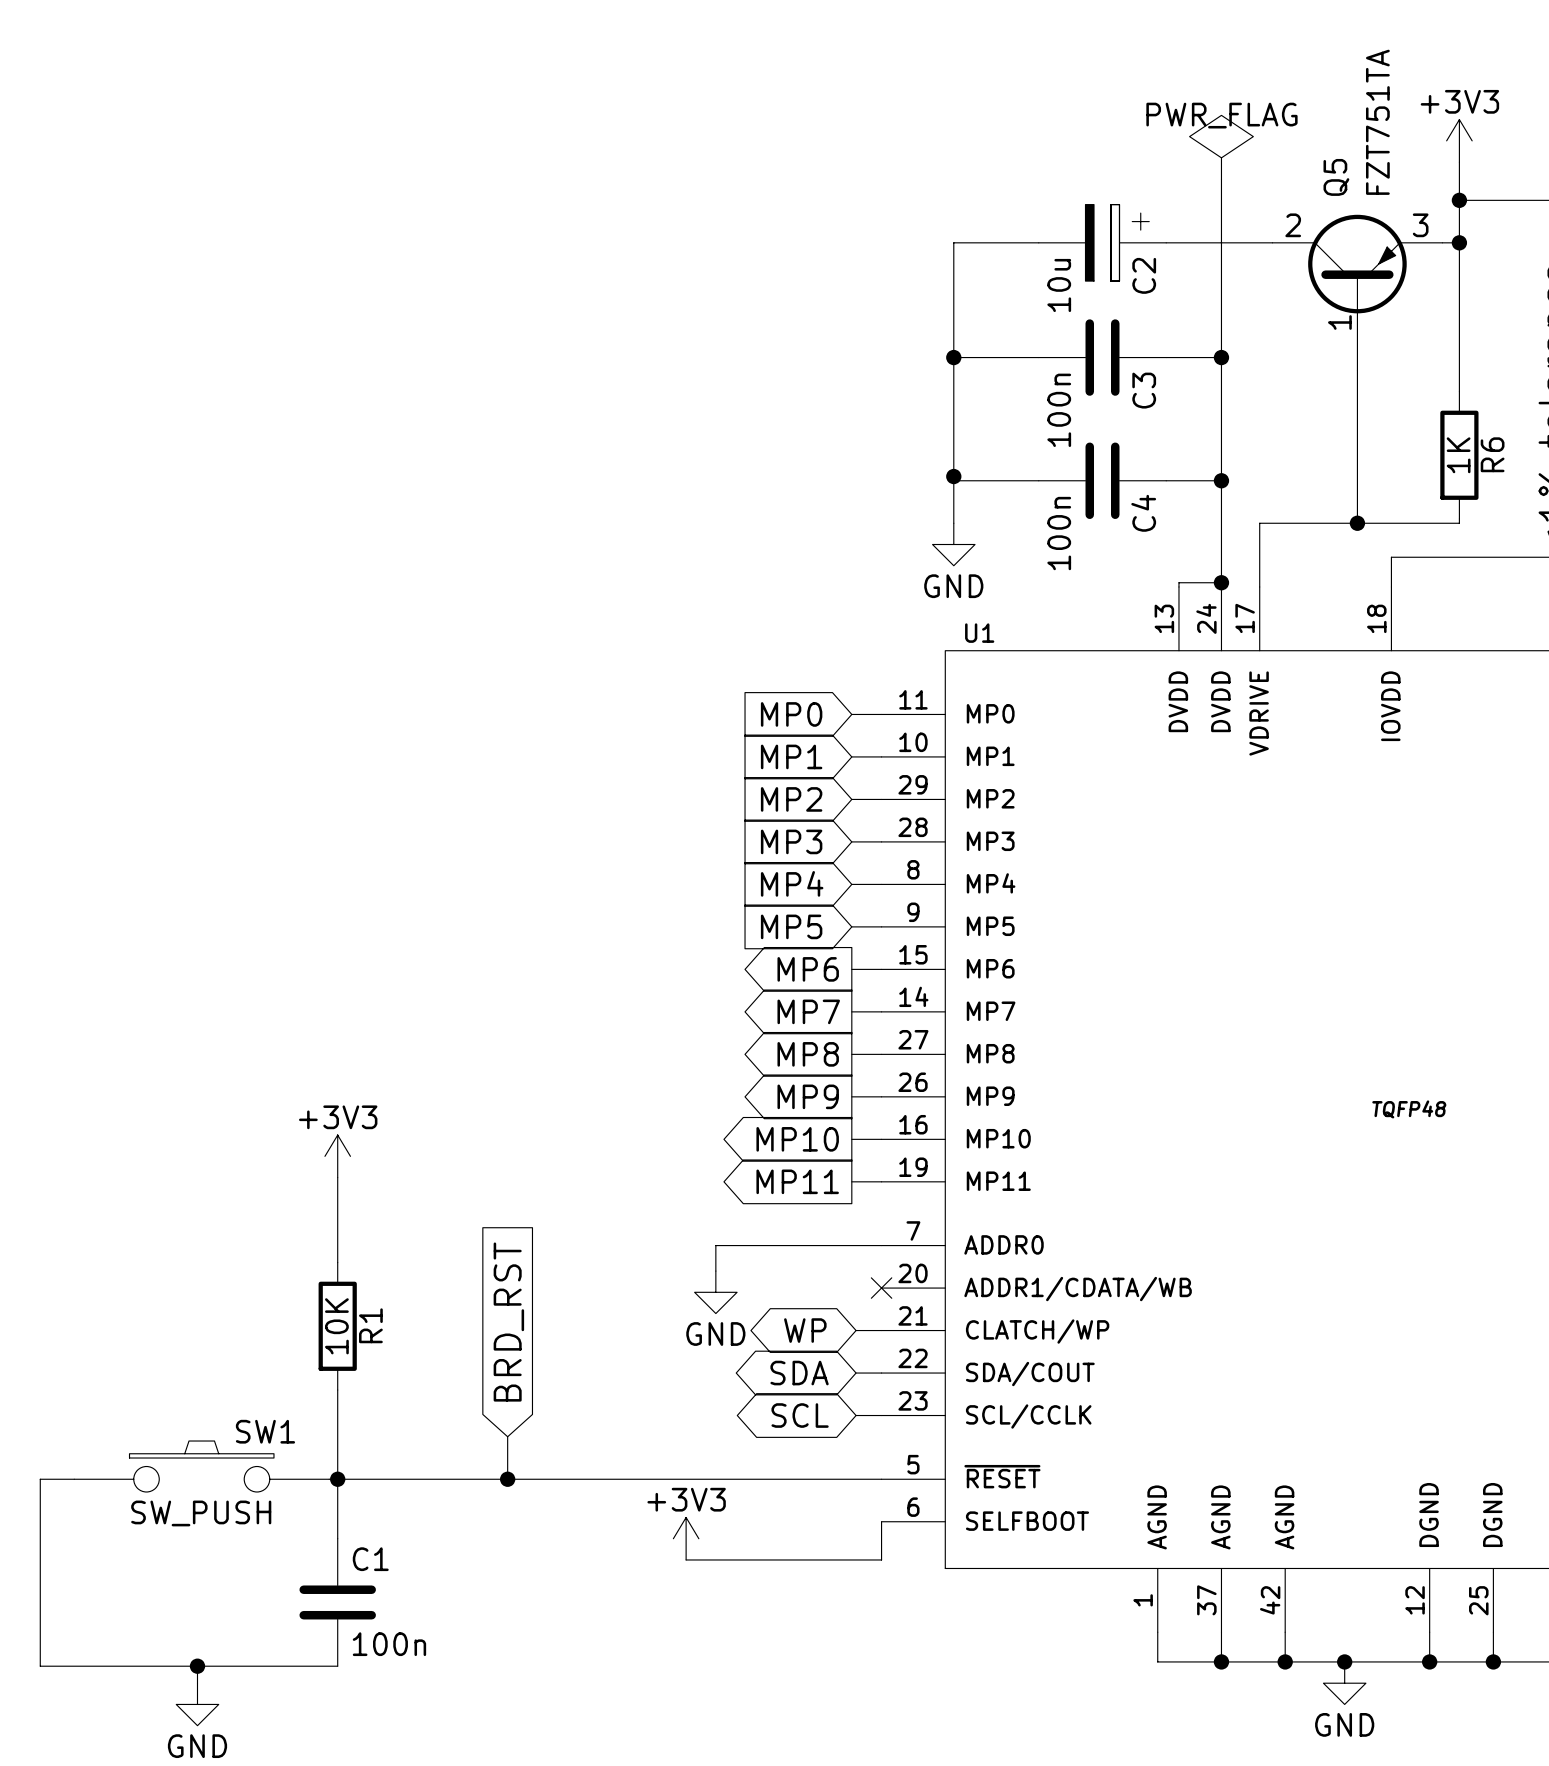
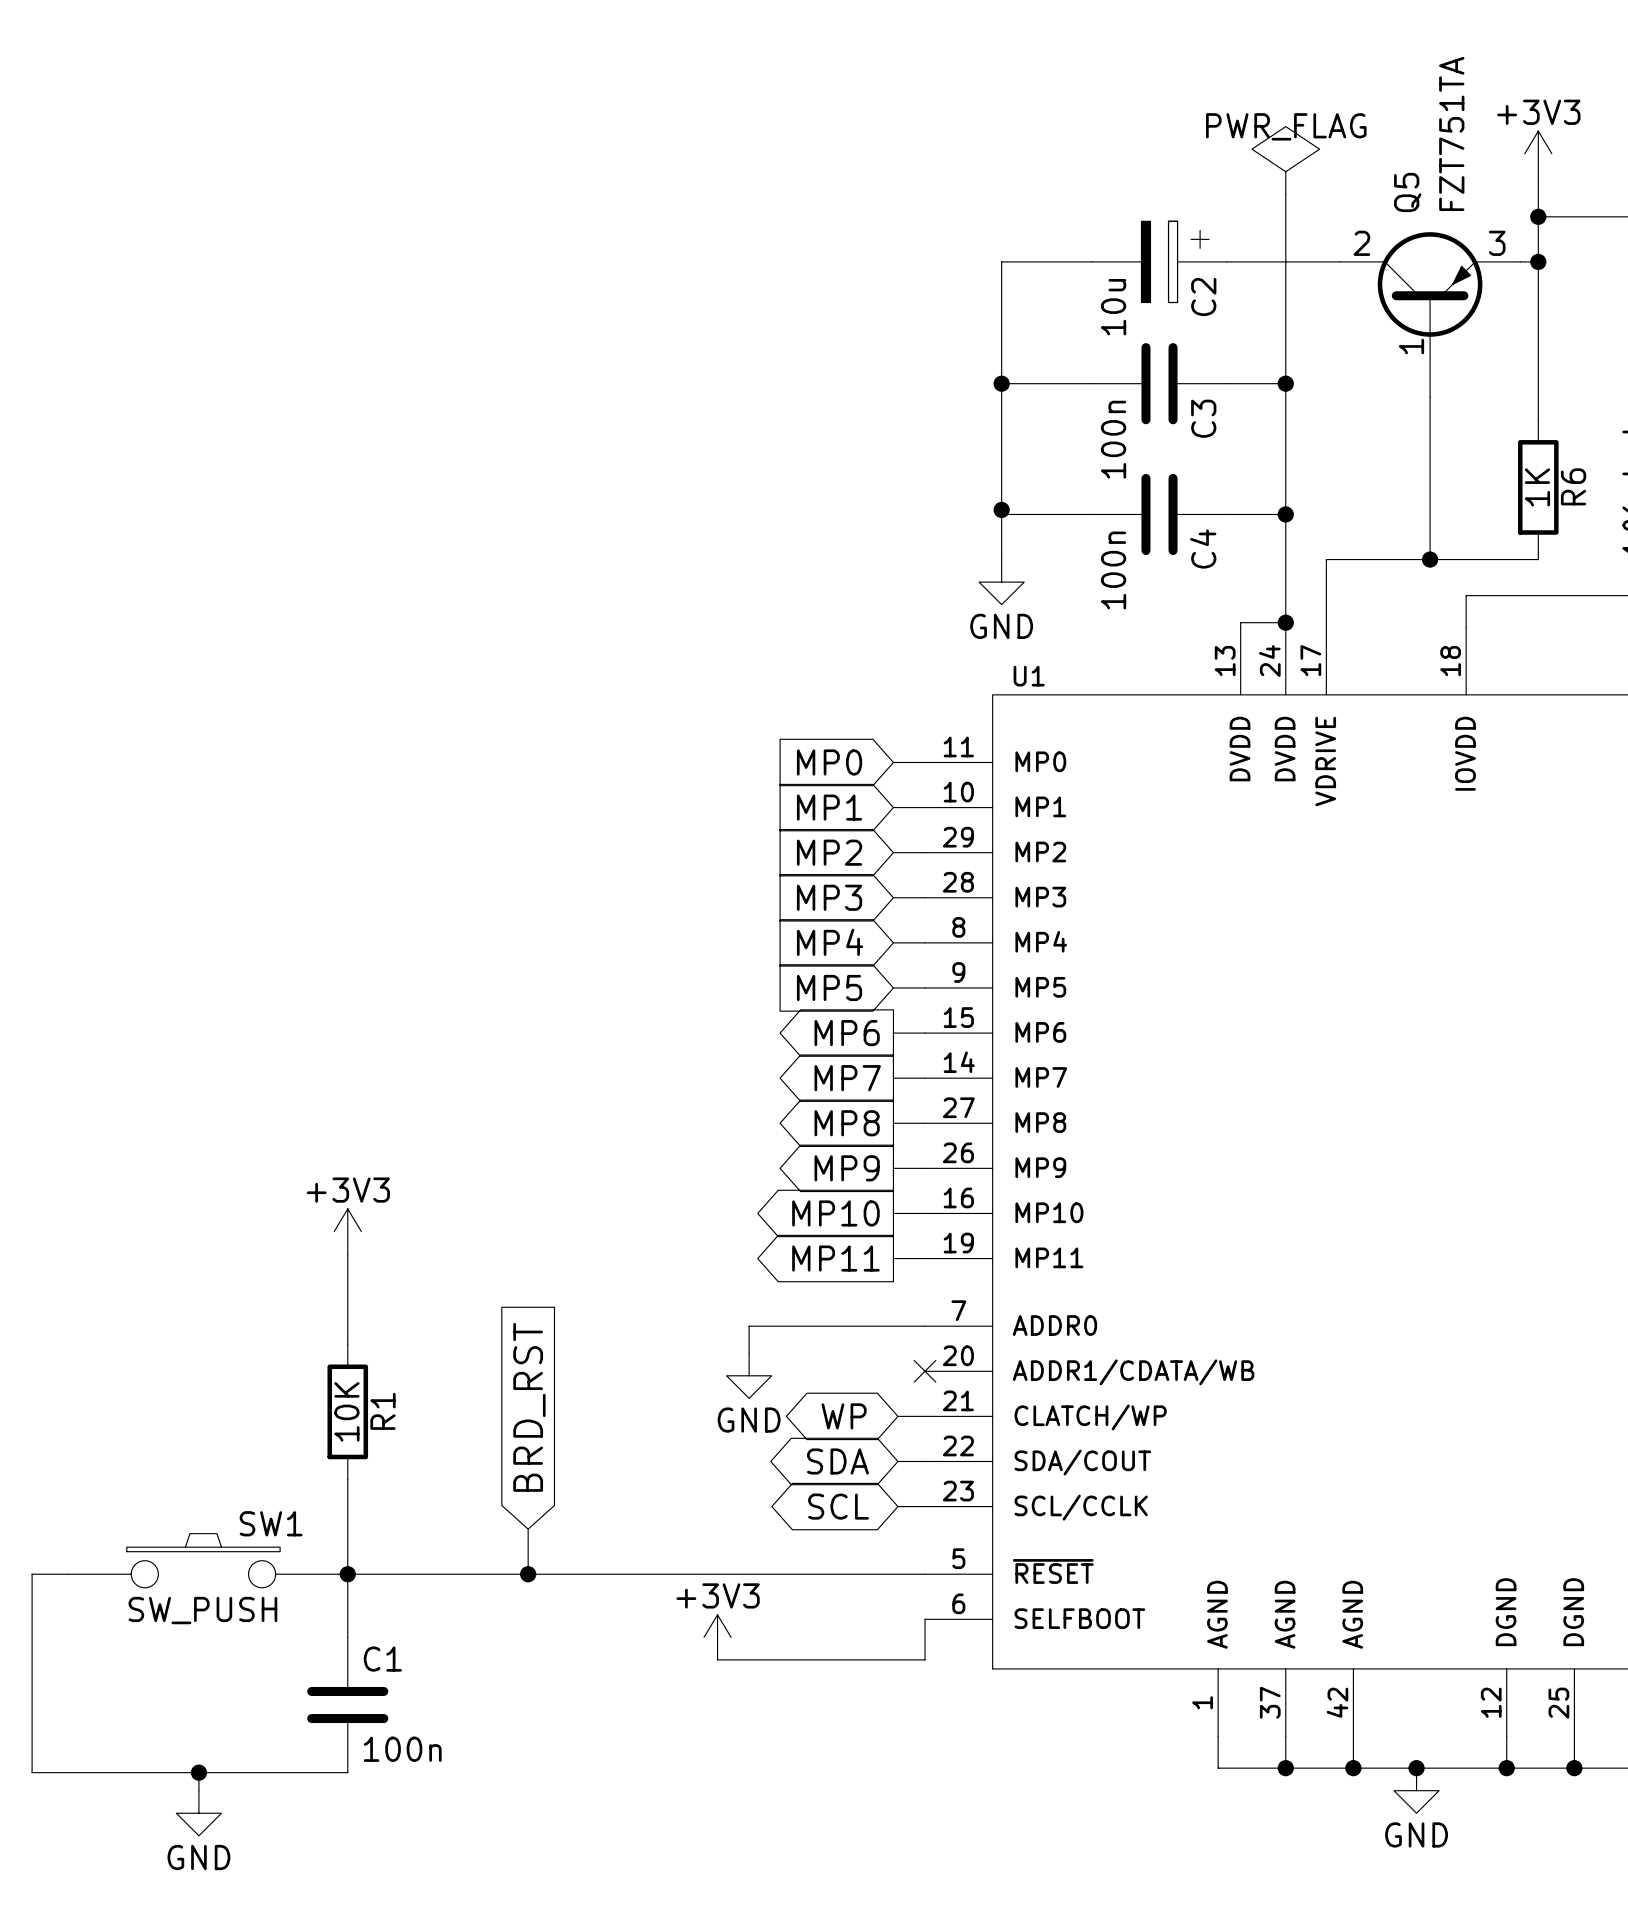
U1 text: TQFP48 (1409, 1109) -> none

